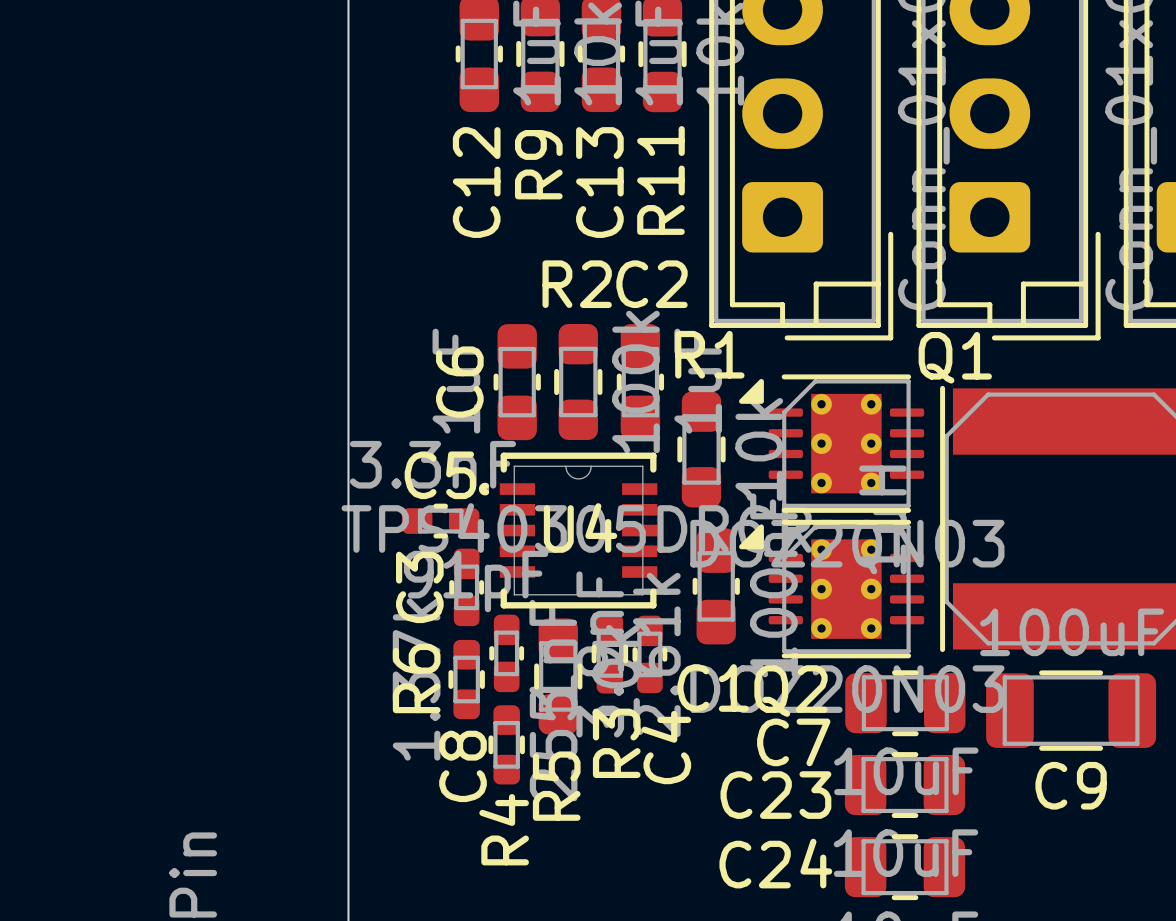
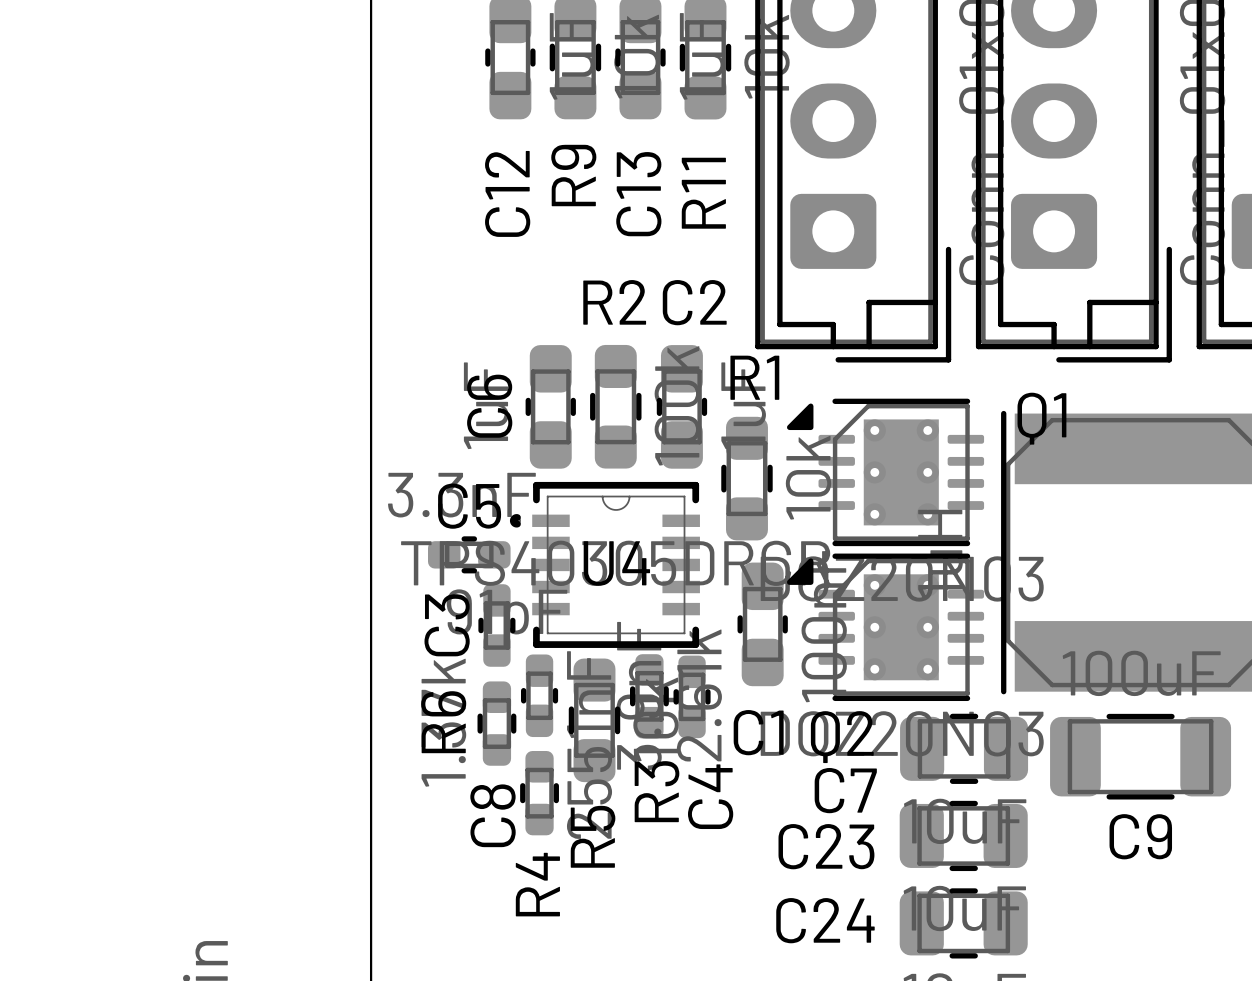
Q1 name position: Q1 (955, 357) -> Q1 (1041, 418)

